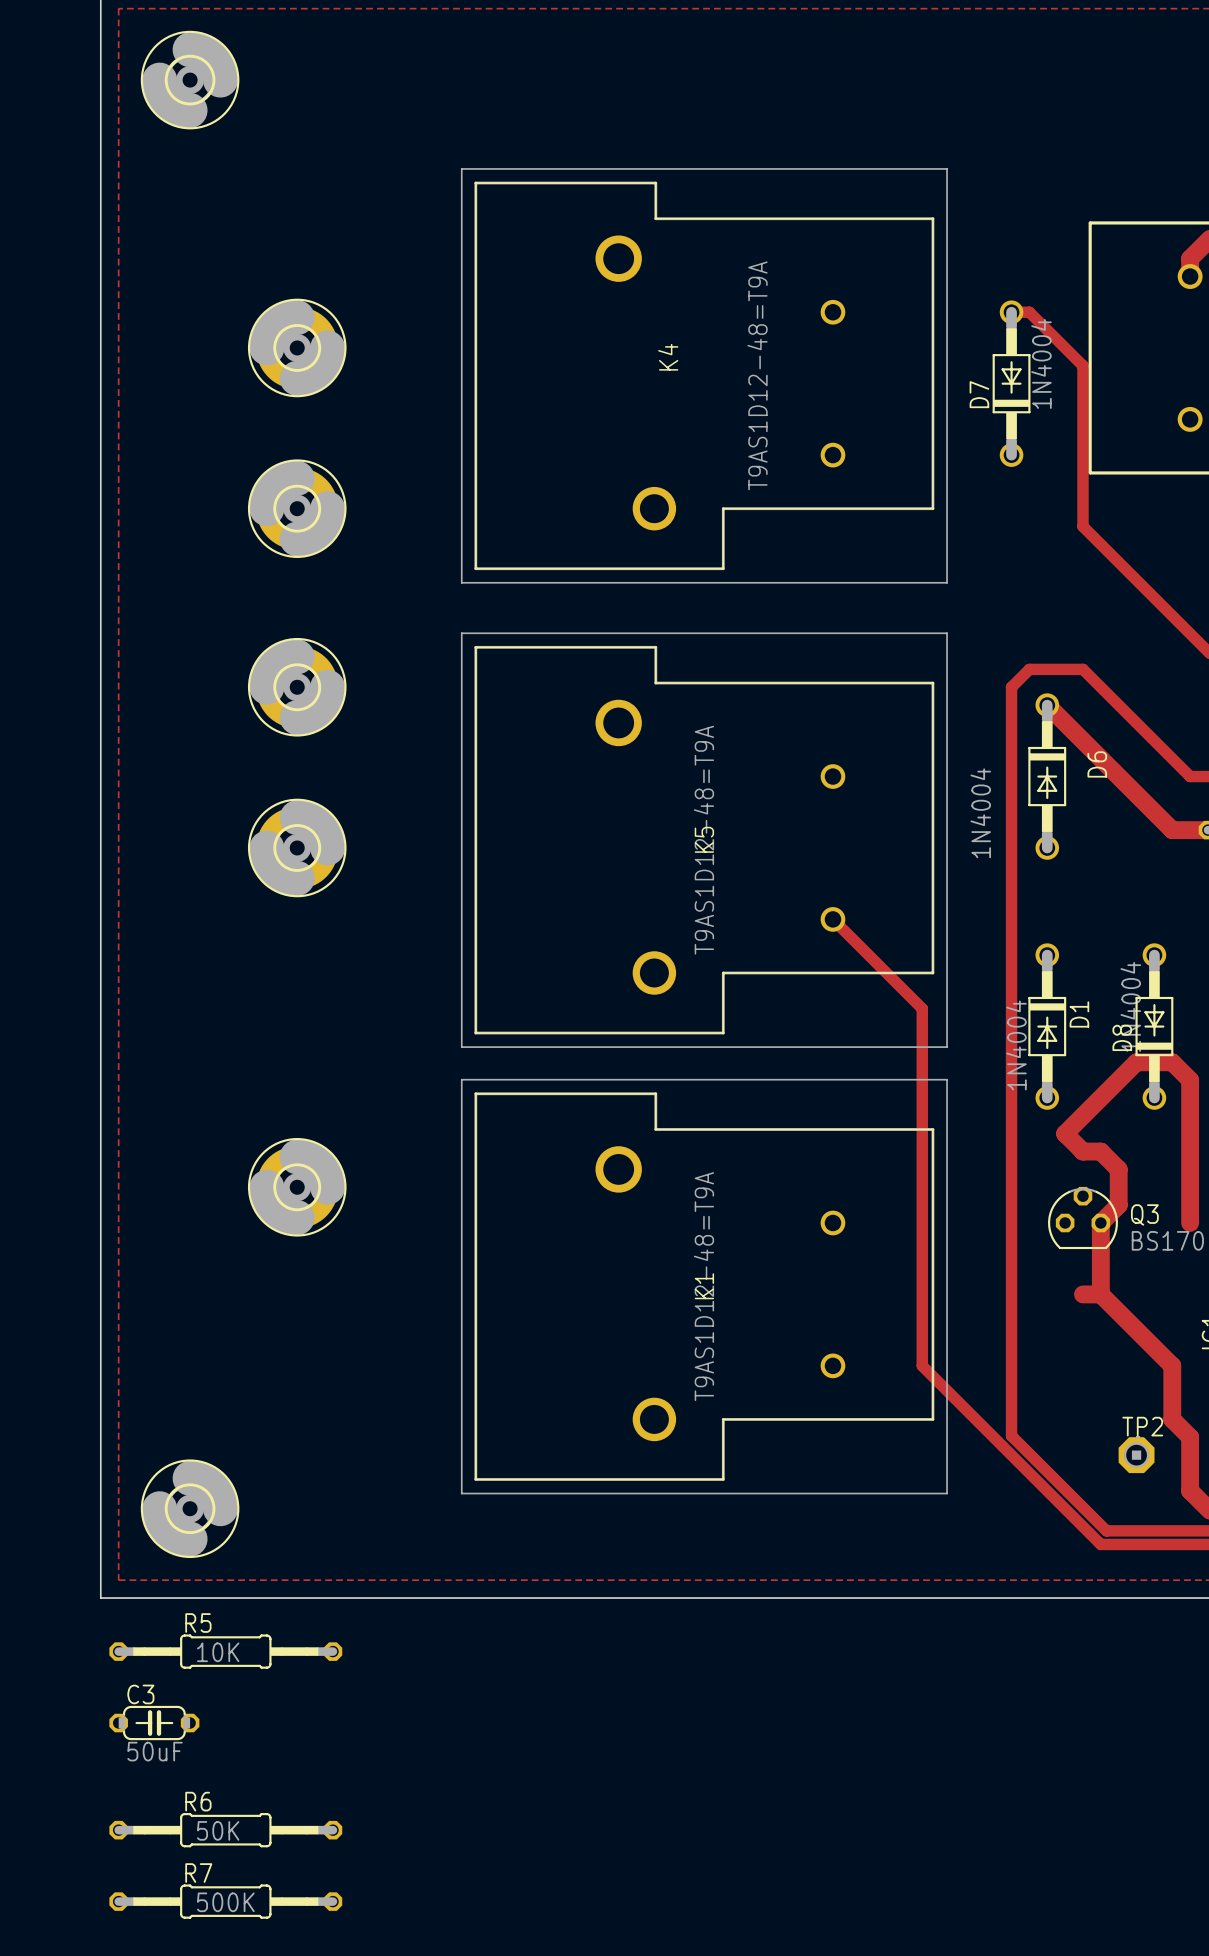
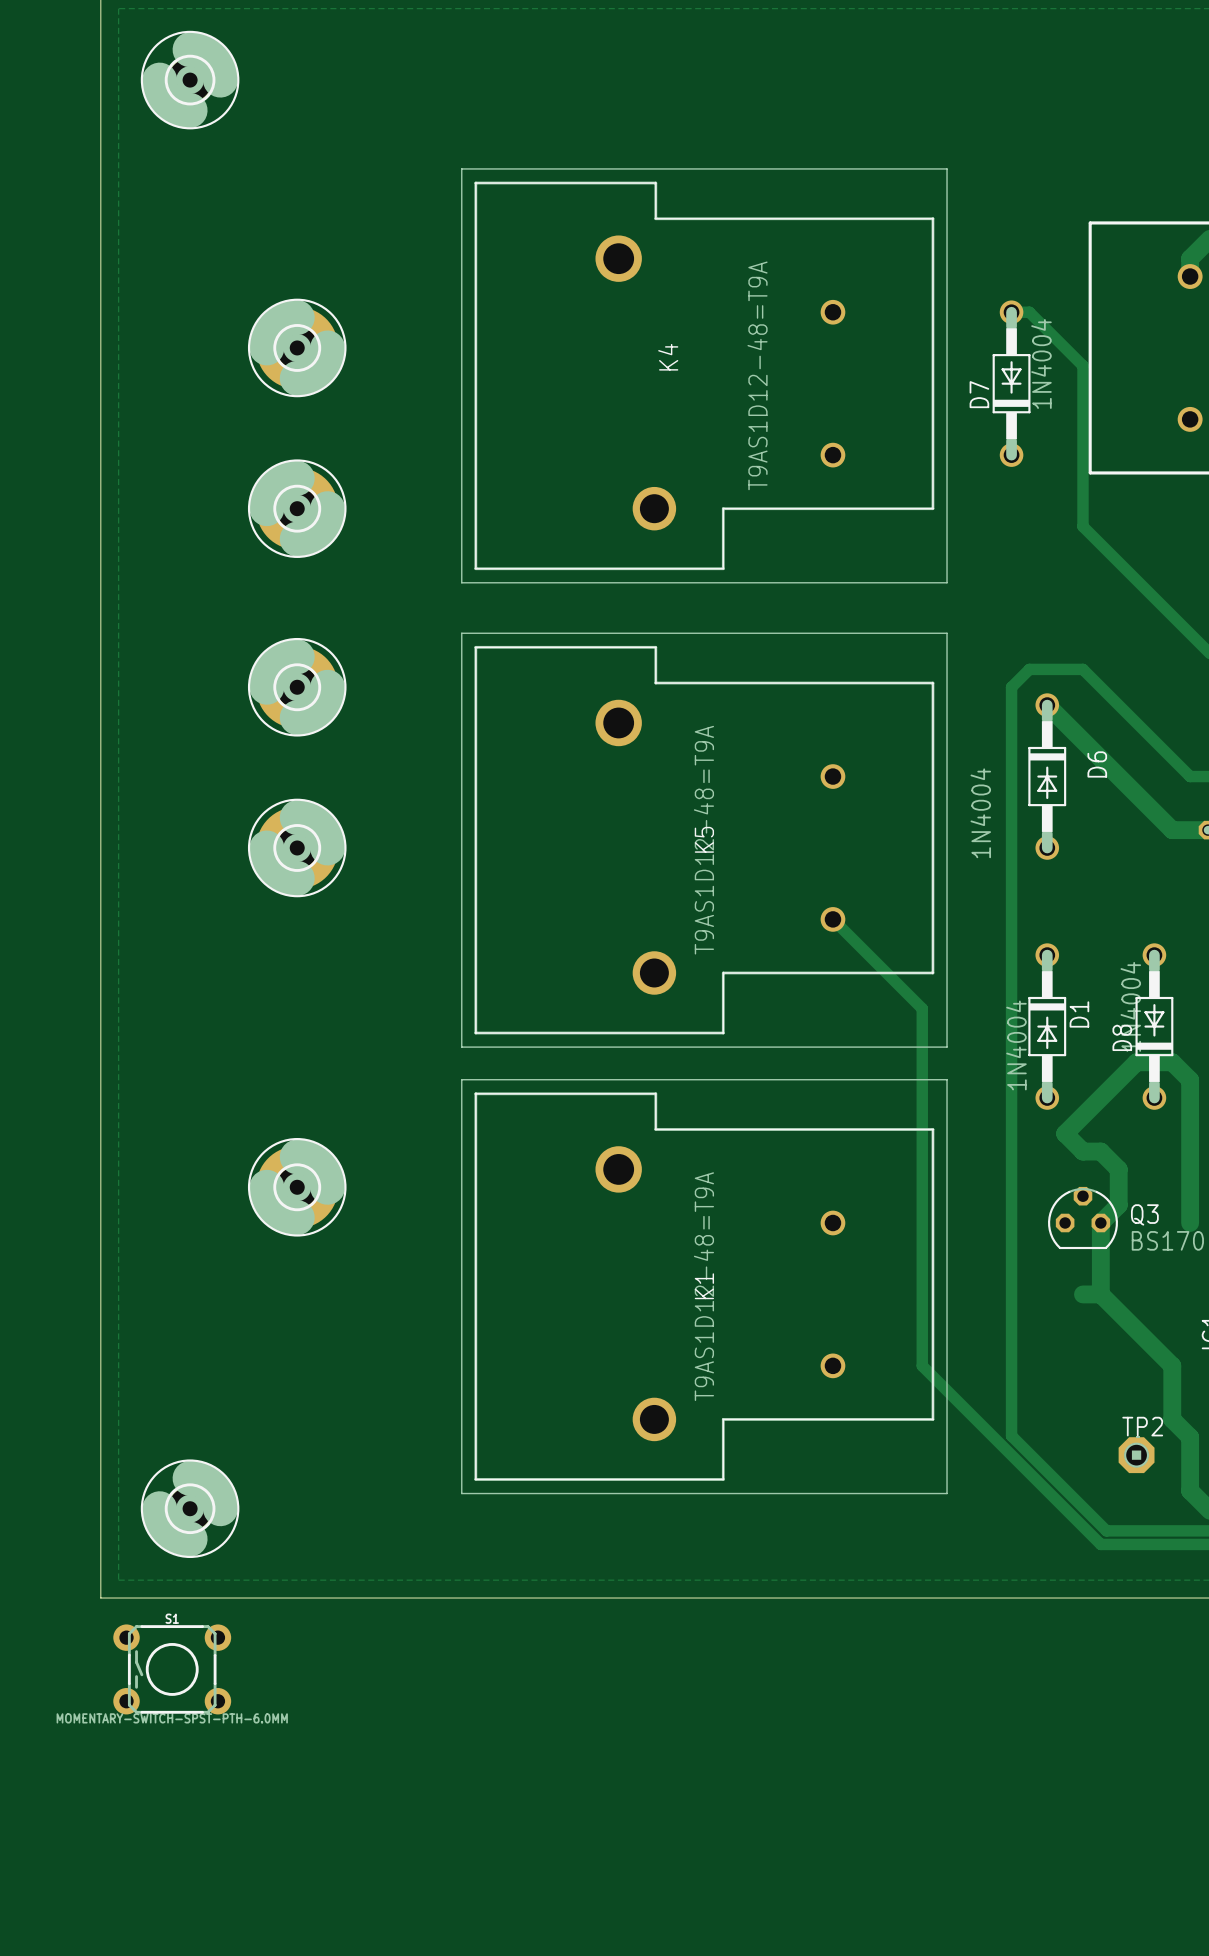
R5: 10K (225, 1651) -> none
S1: none -> MOMENTARY-SWITCH-SPST-PTH-6.0MM (172, 1669)
C3: 50uF (154, 1723) -> none
R6: 50K (225, 1830) -> none
R7: 500K (225, 1901) -> none

